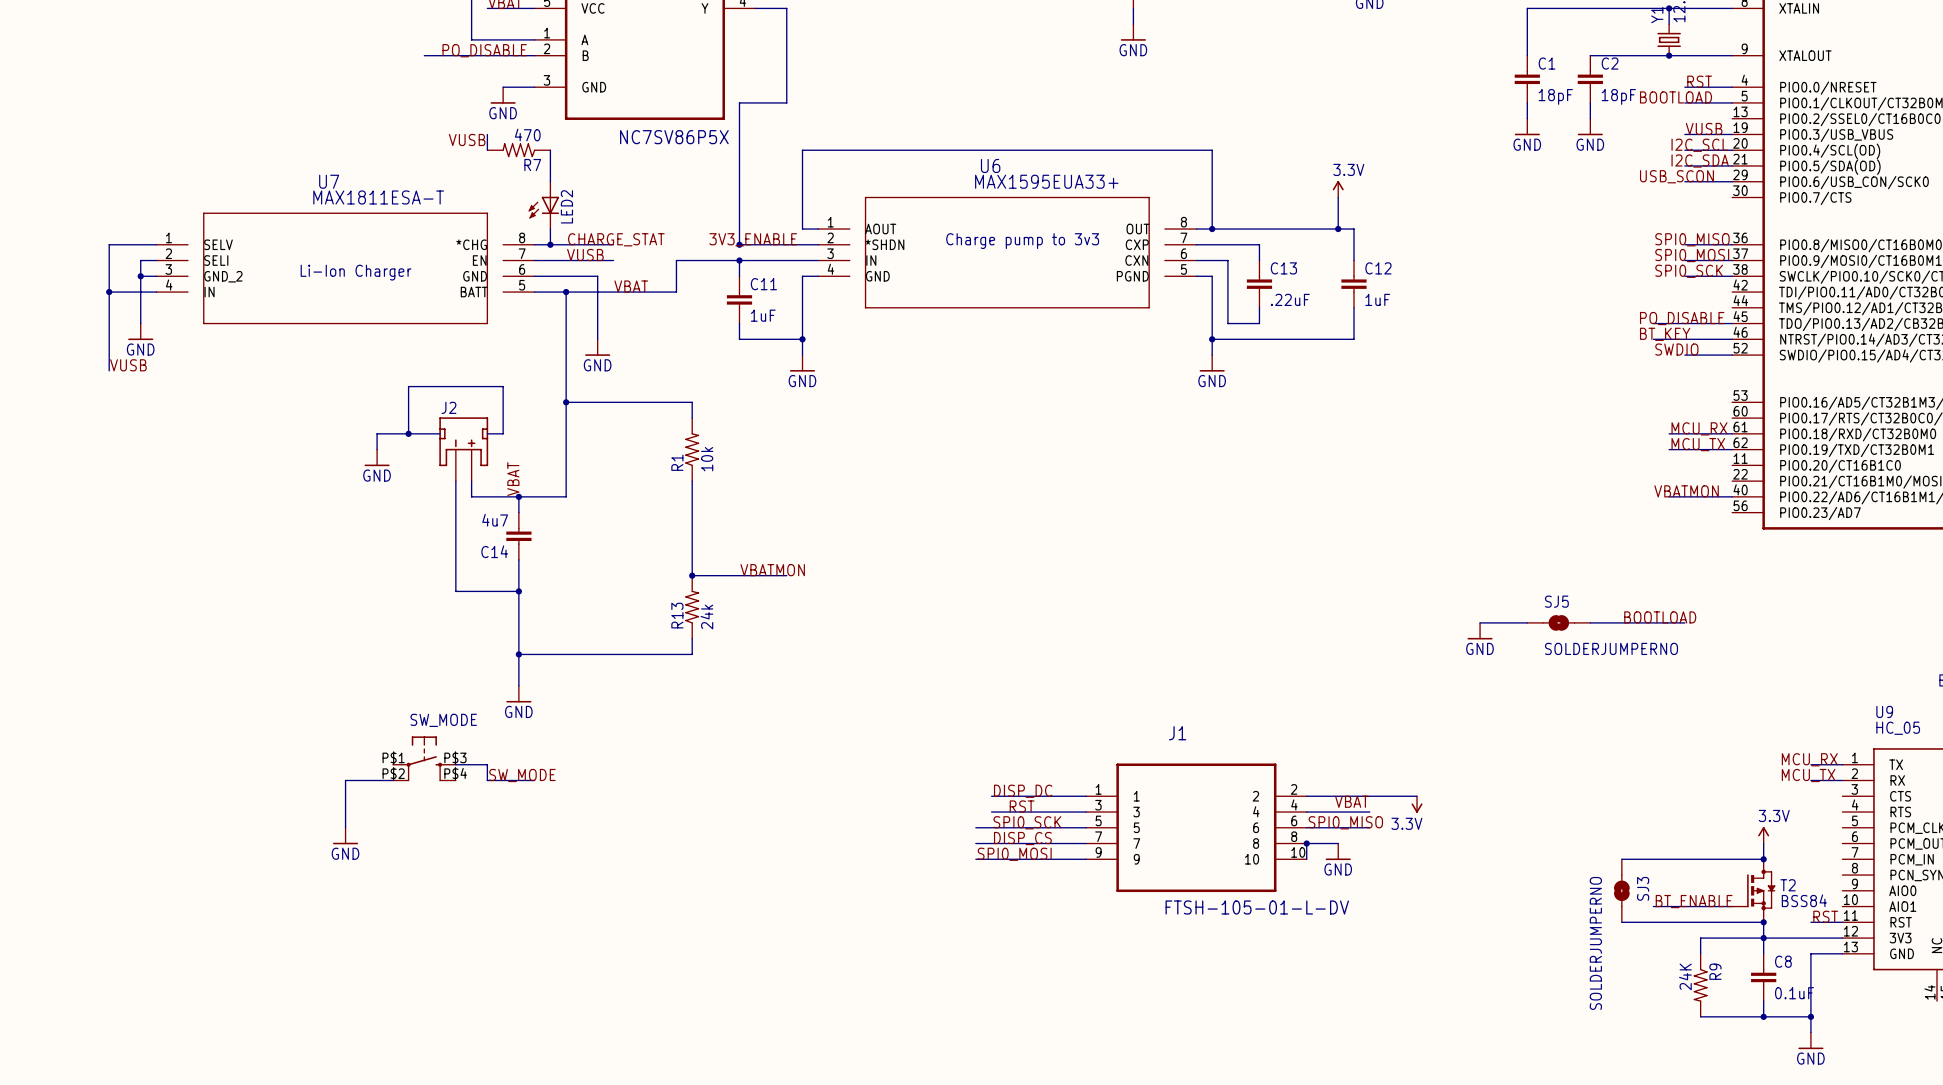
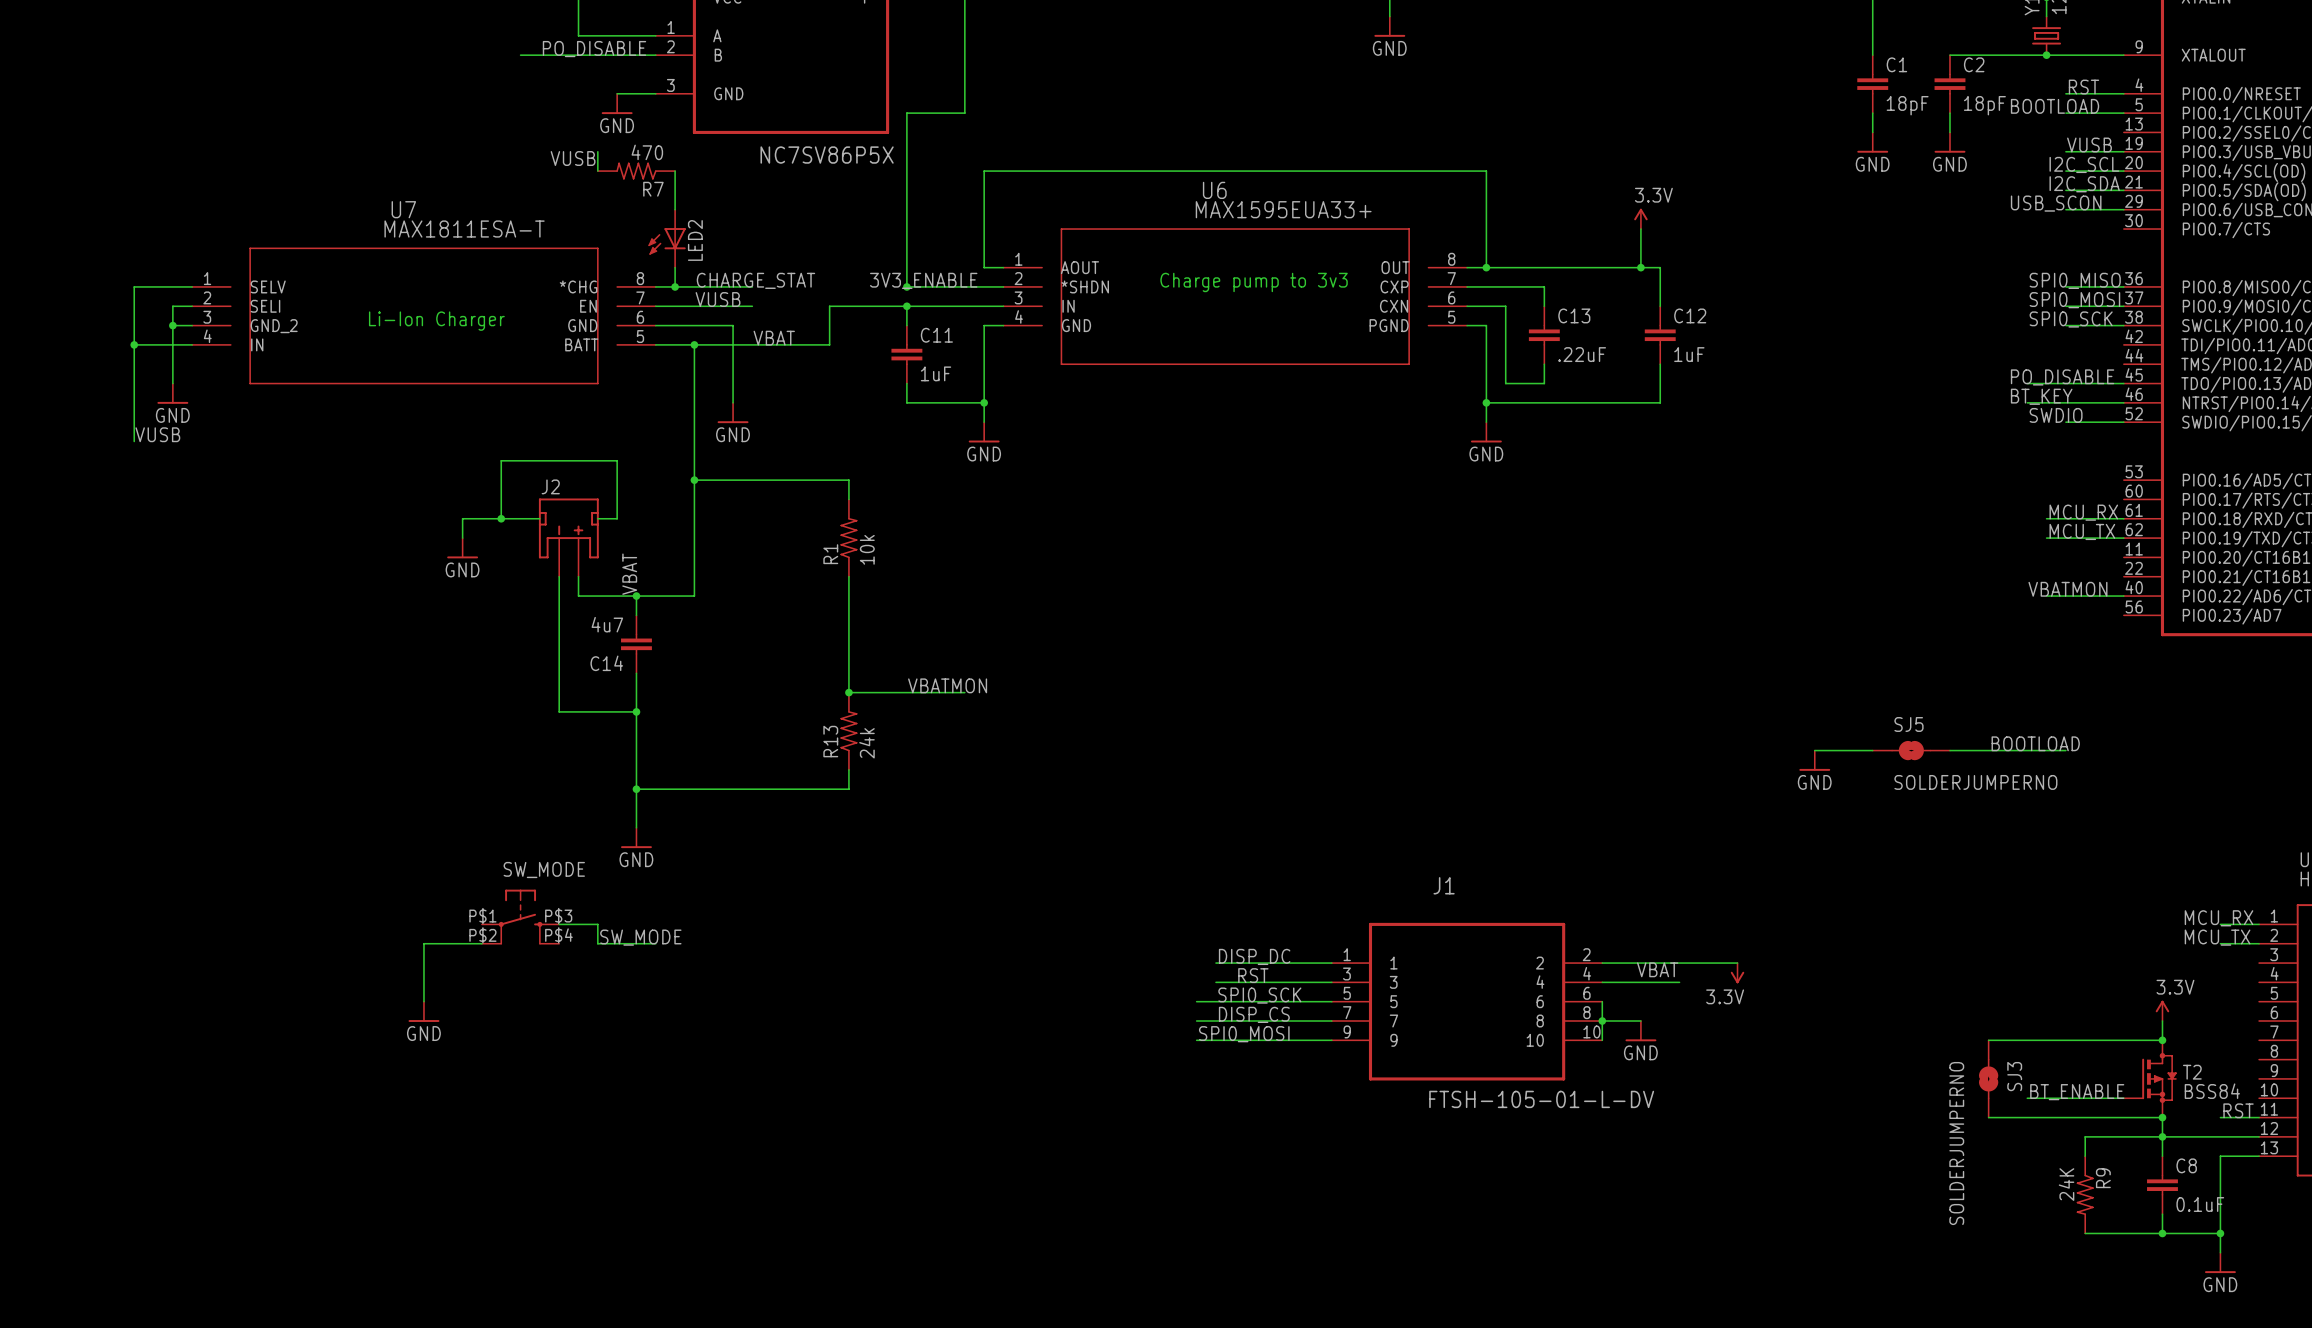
label: SPI0_MISO (1345, 822) -> none
wire: (1306, 827) (1369, 827) -> (1602, 1001) (1602, 1020)

